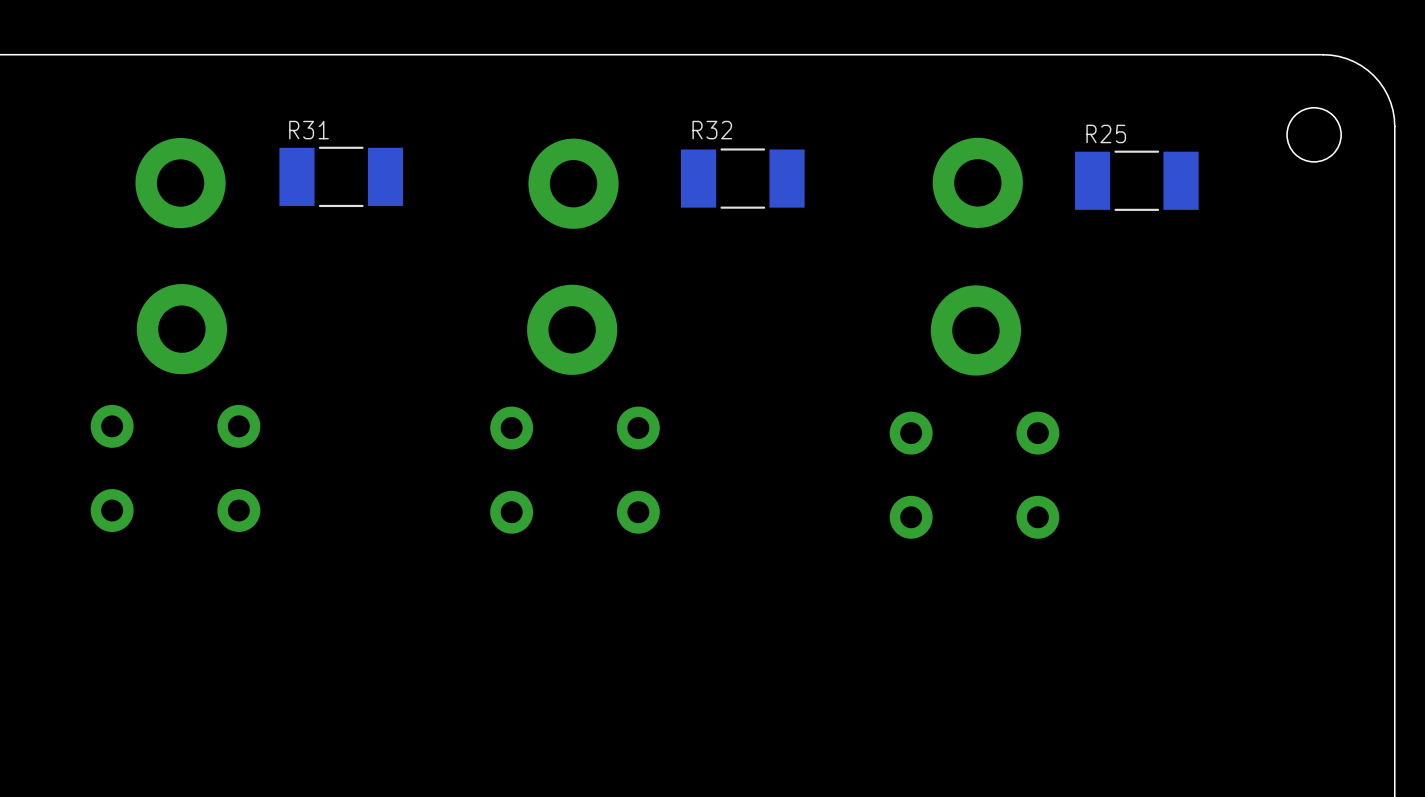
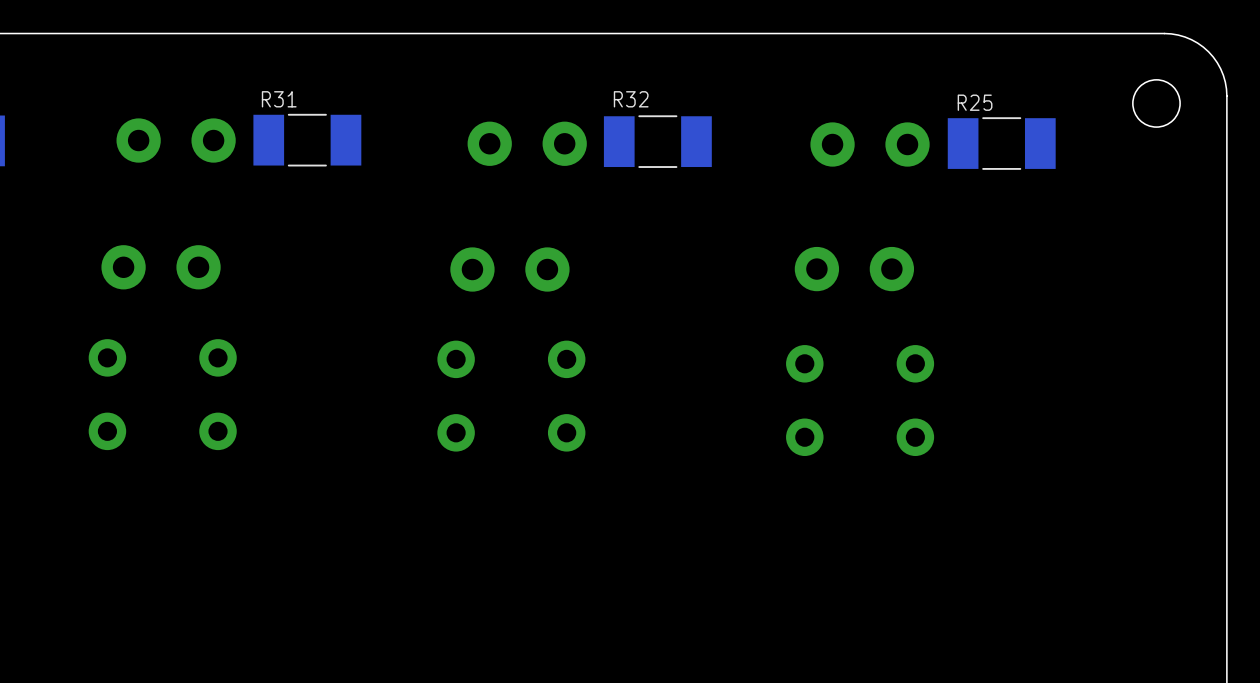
part footprint: [135, 137, 226, 229] -> [116, 118, 236, 163]
part footprint: [932, 137, 1023, 228] -> [810, 122, 930, 167]
part: none -> (527, 143)
part: (573, 183) -> none
part footprint: [136, 284, 227, 375] -> [101, 245, 221, 290]
part footprint: [527, 284, 618, 375] -> [450, 247, 570, 292]
part footprint: [930, 285, 1022, 376] -> [794, 246, 915, 292]

